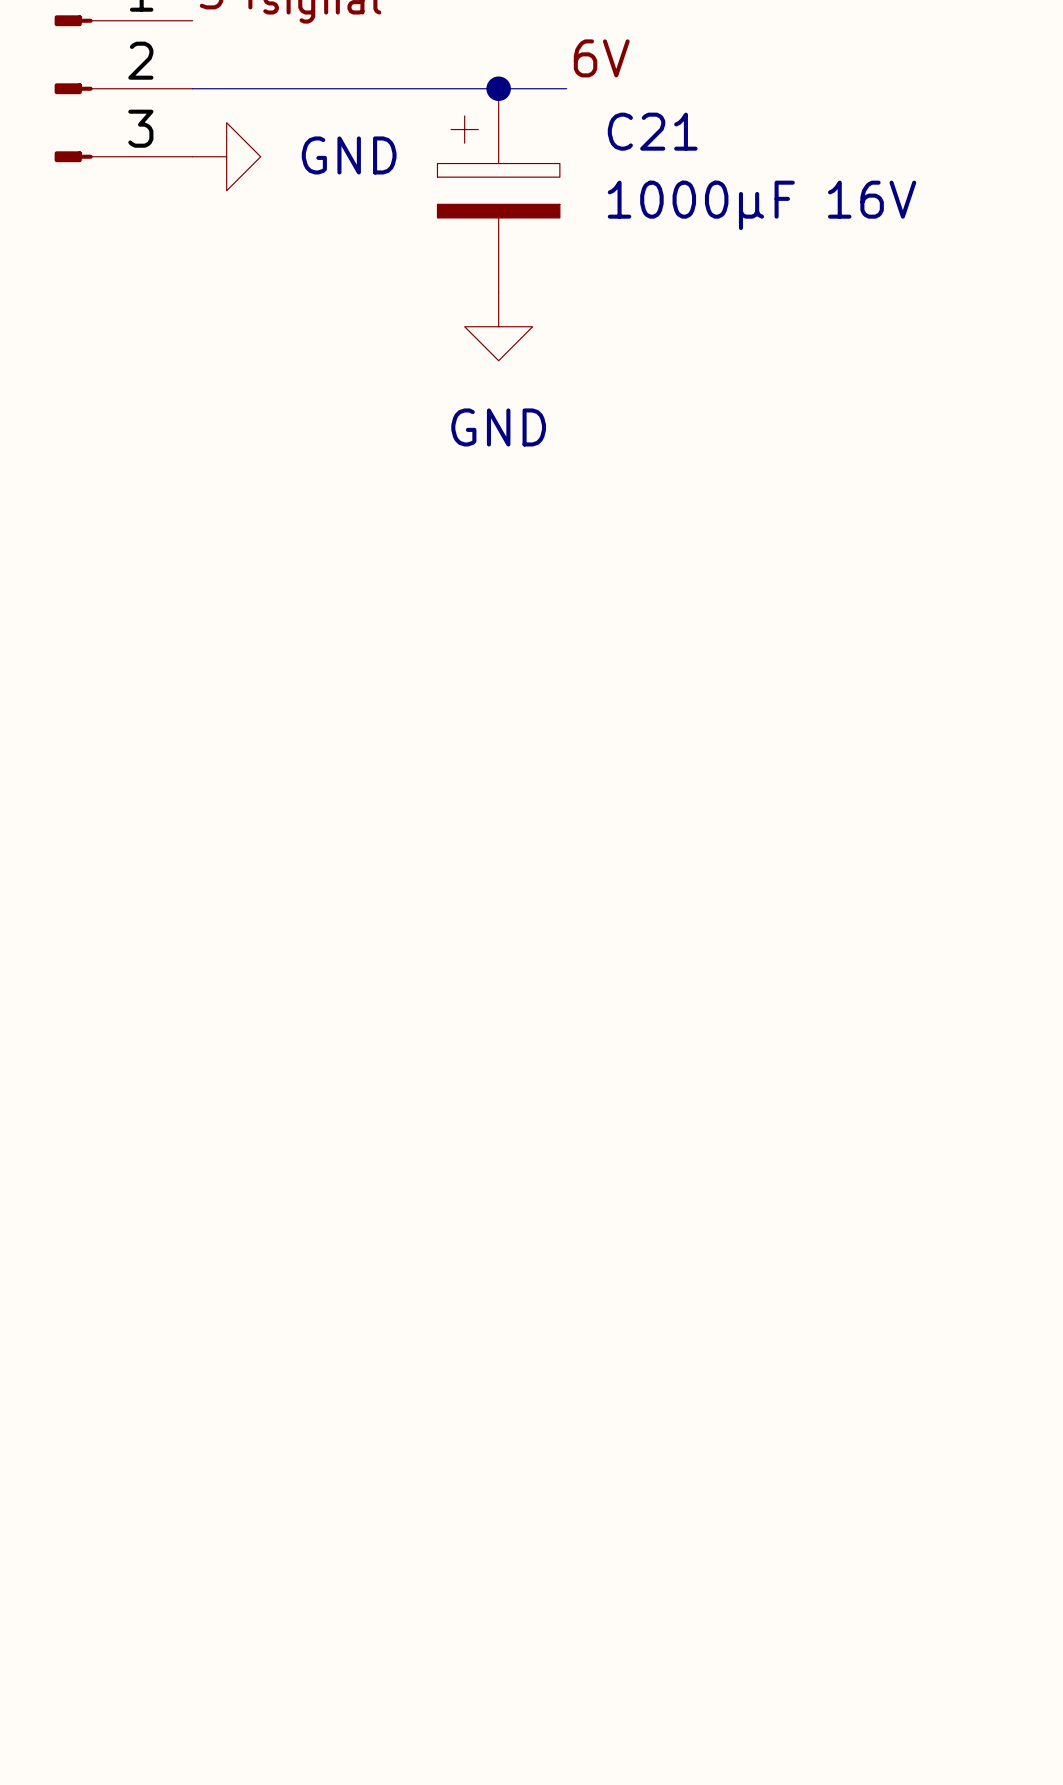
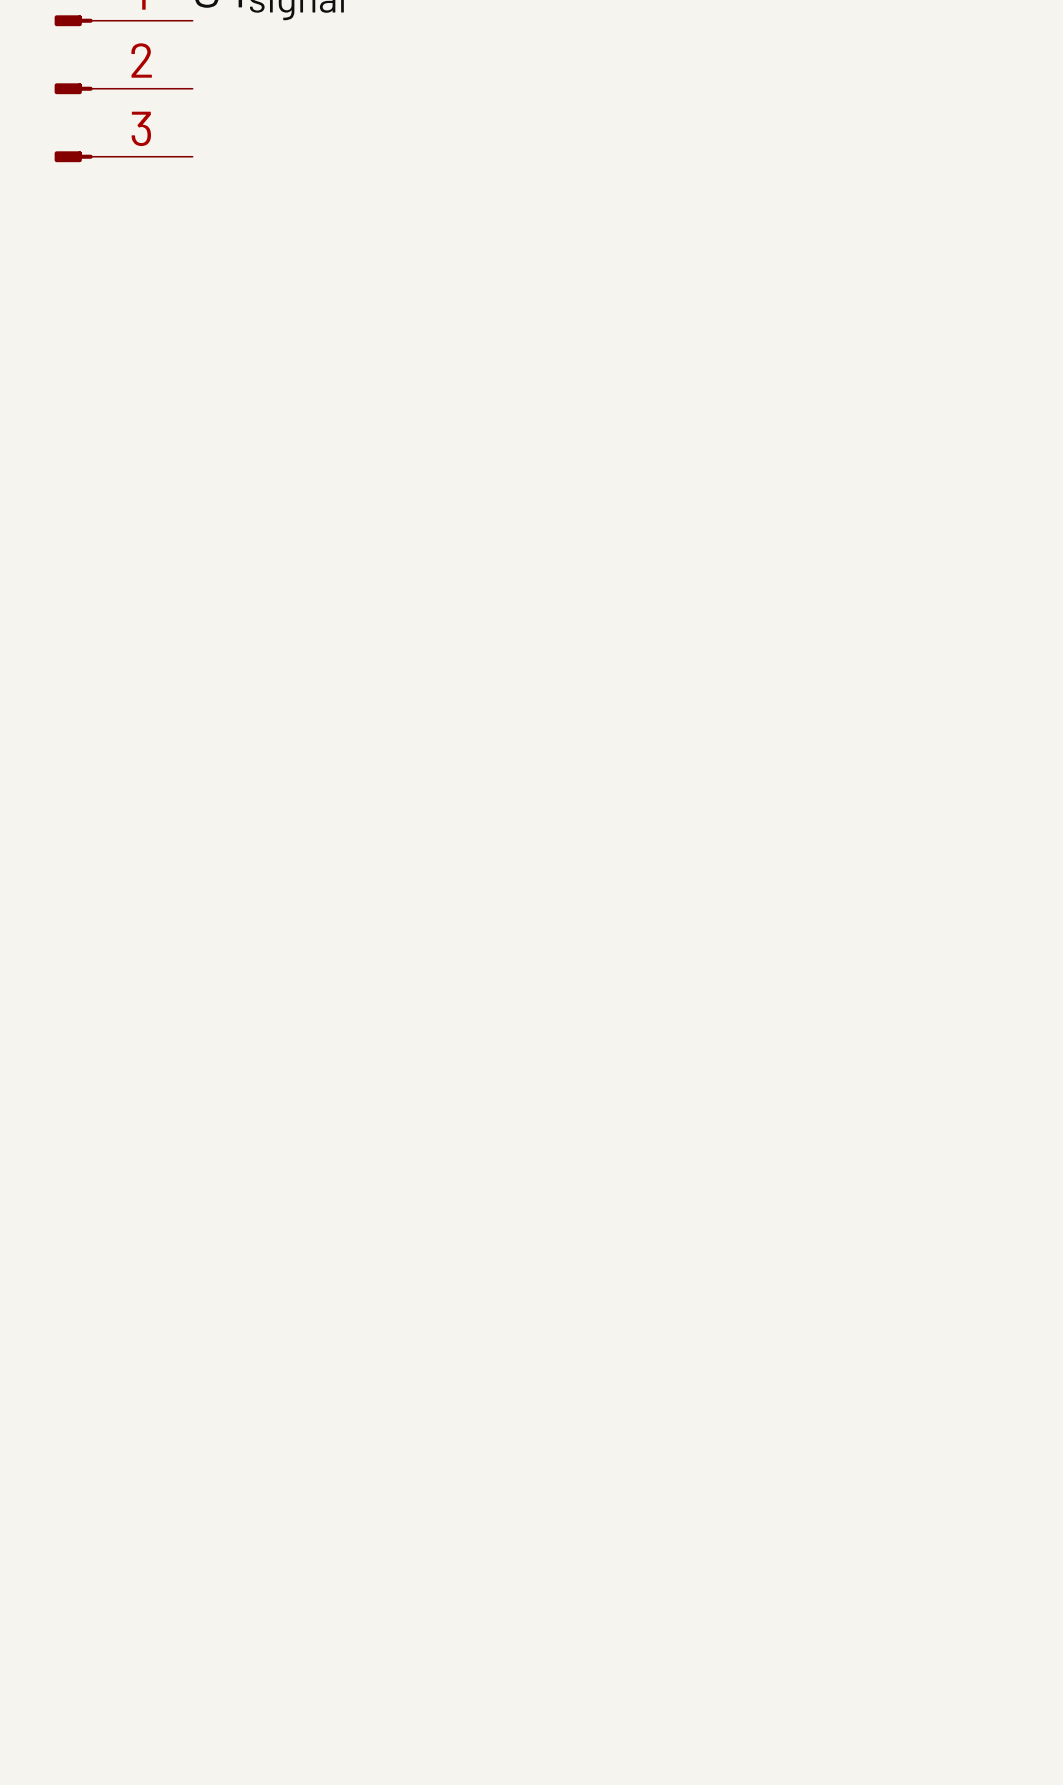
label: 6V (601, 58) -> none
wire: (192, 88) (566, 88) -> none
junction: (498, 88) -> none
power symbol: GND (226, 156) -> none
C21: 1000µF 16V (498, 190) -> none
power symbol: GND (498, 326) -> none

